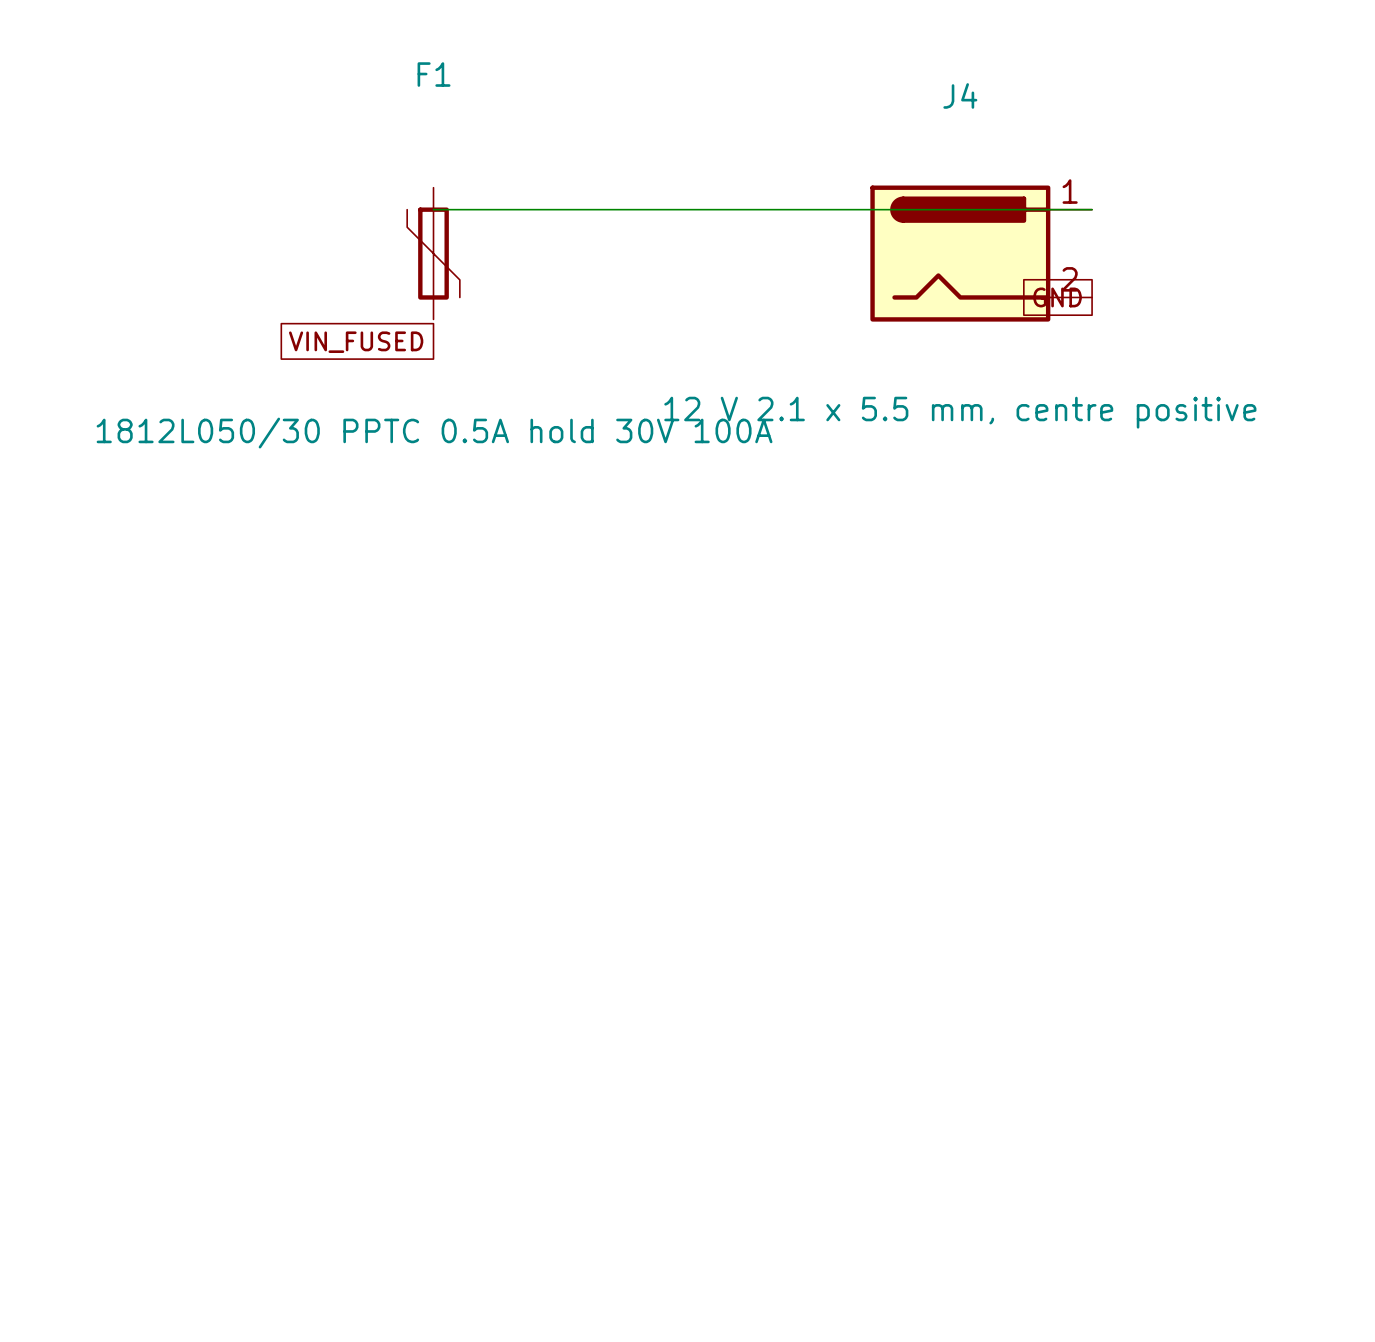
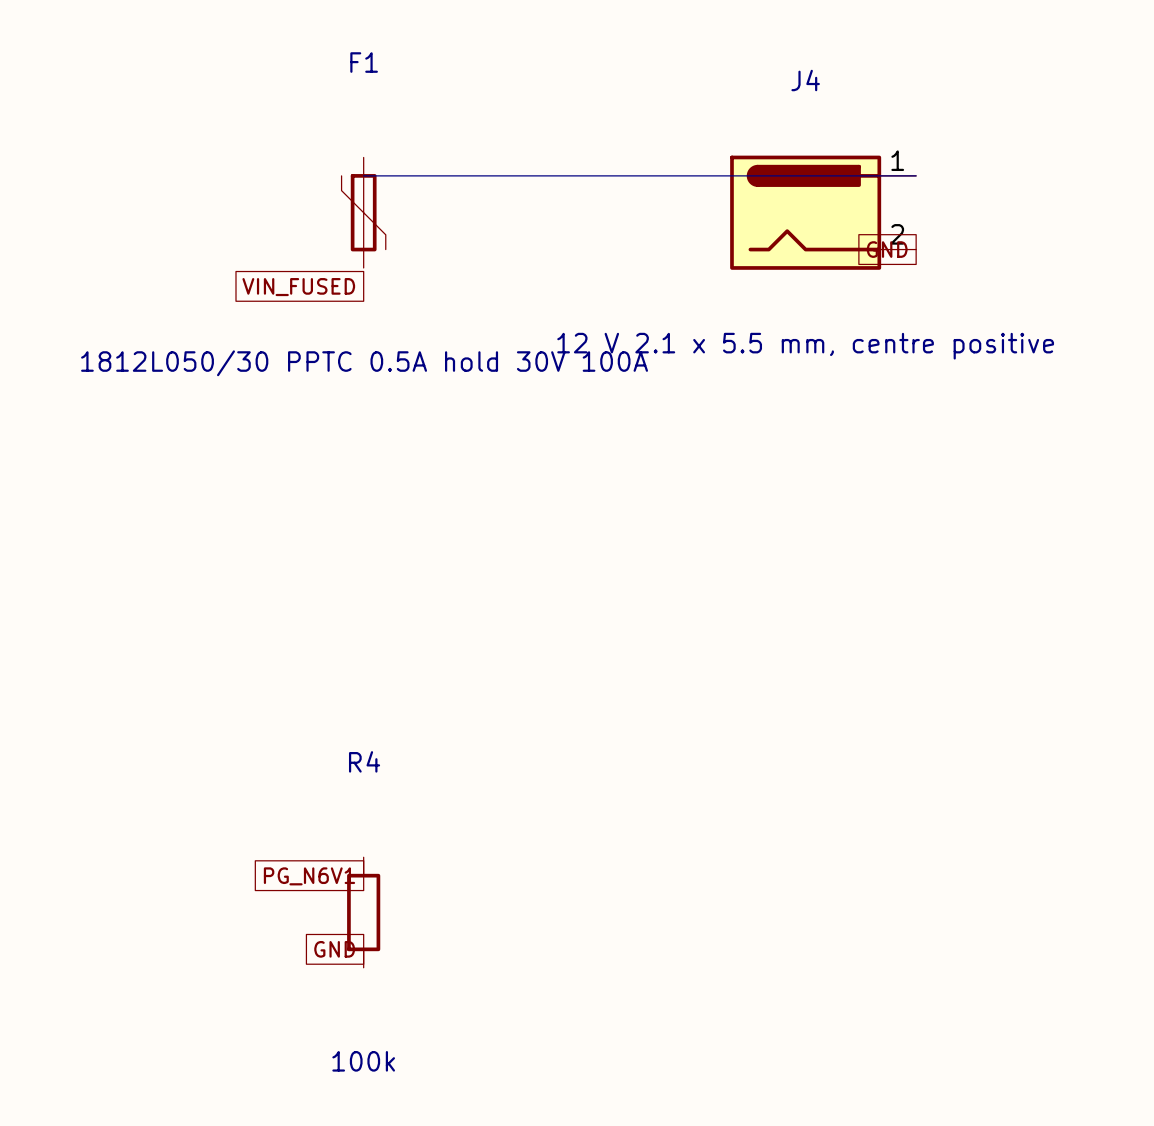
global label: none -> PG_N6V1 (309, 876)
R4: none -> 100k (363, 912)
global label: none -> GND (334, 949)

